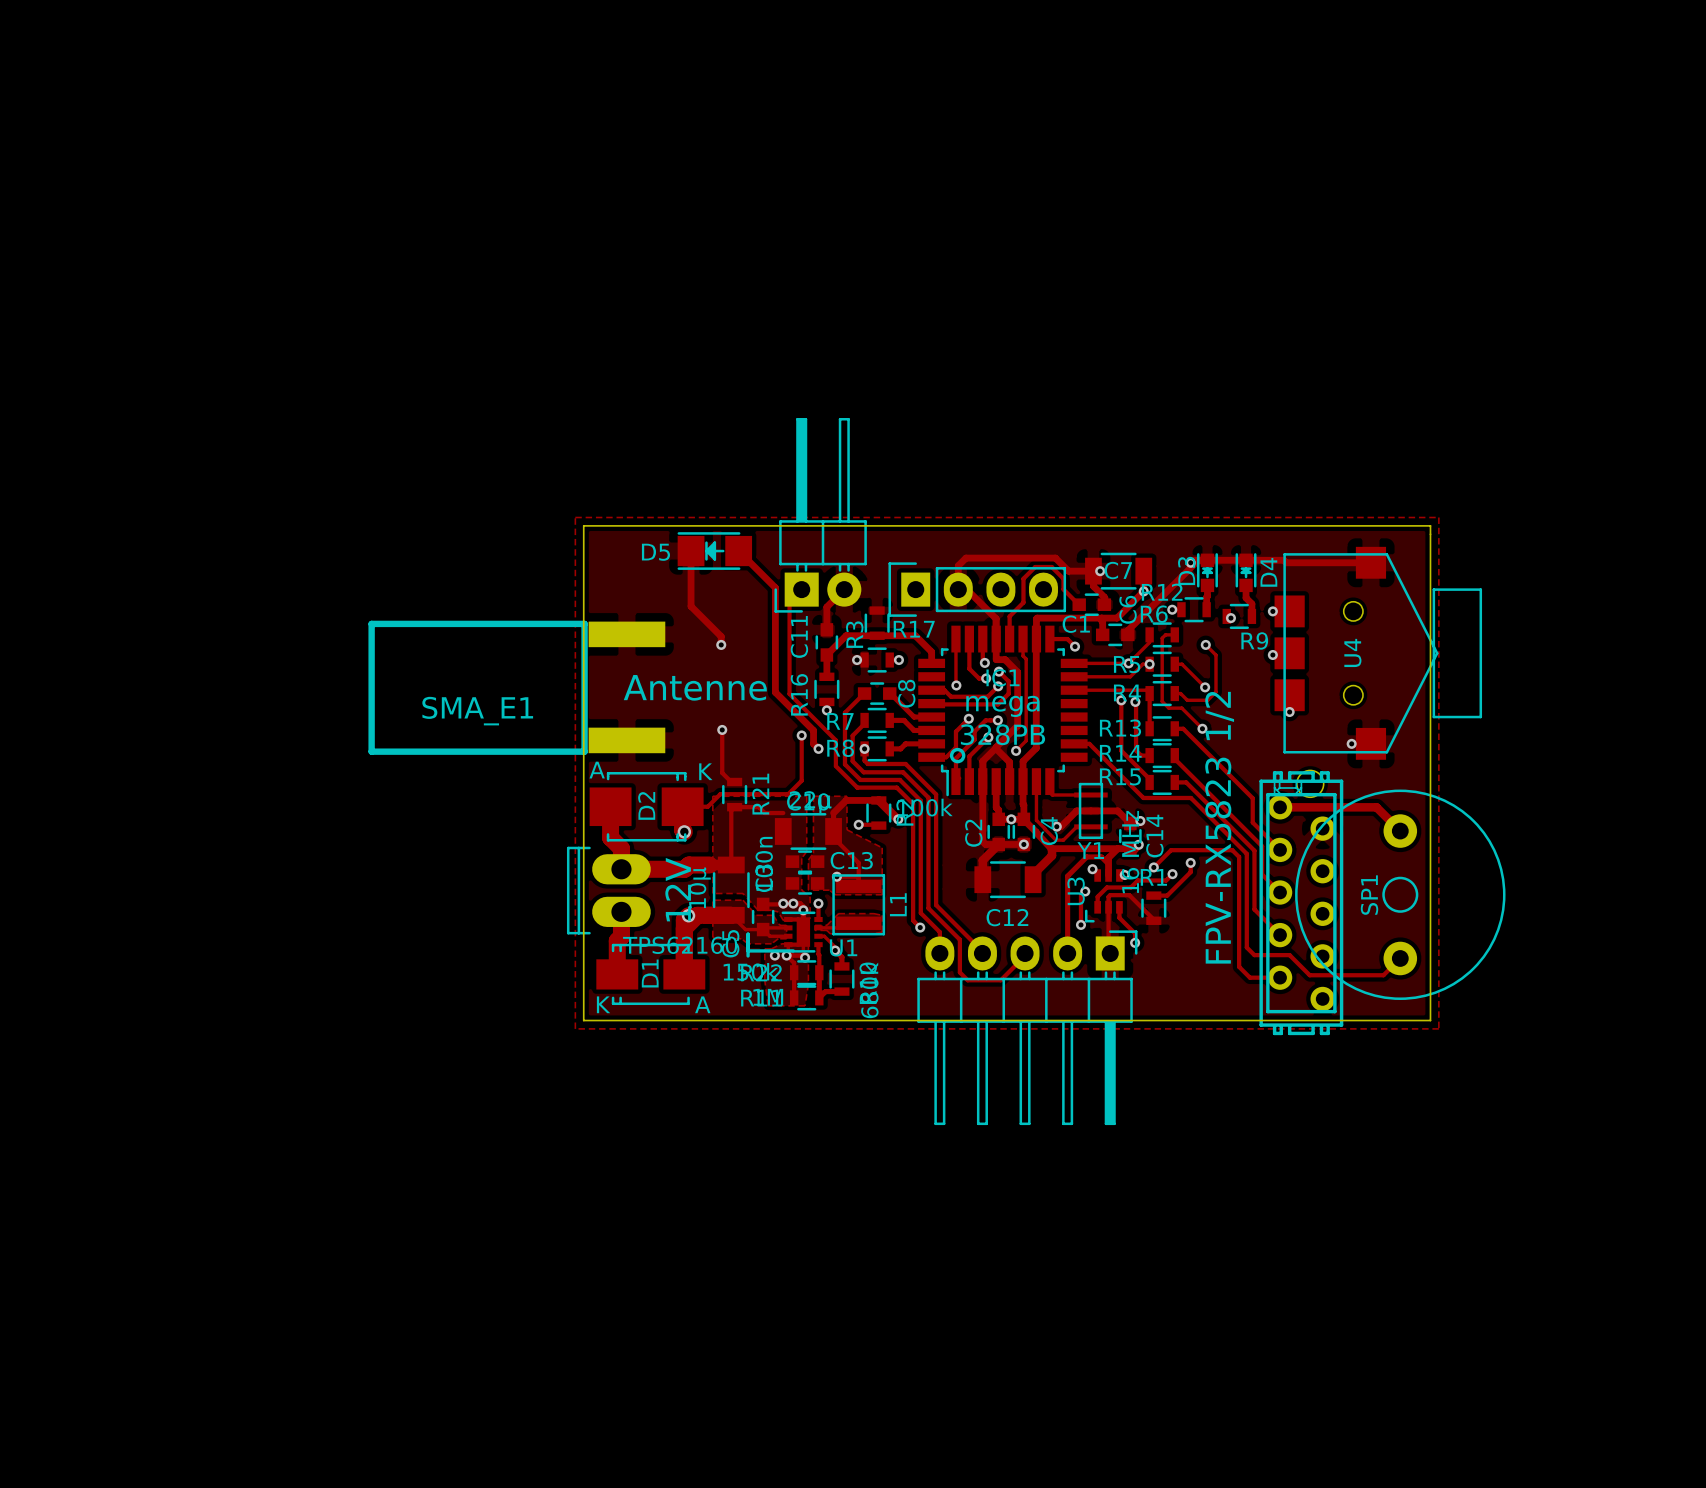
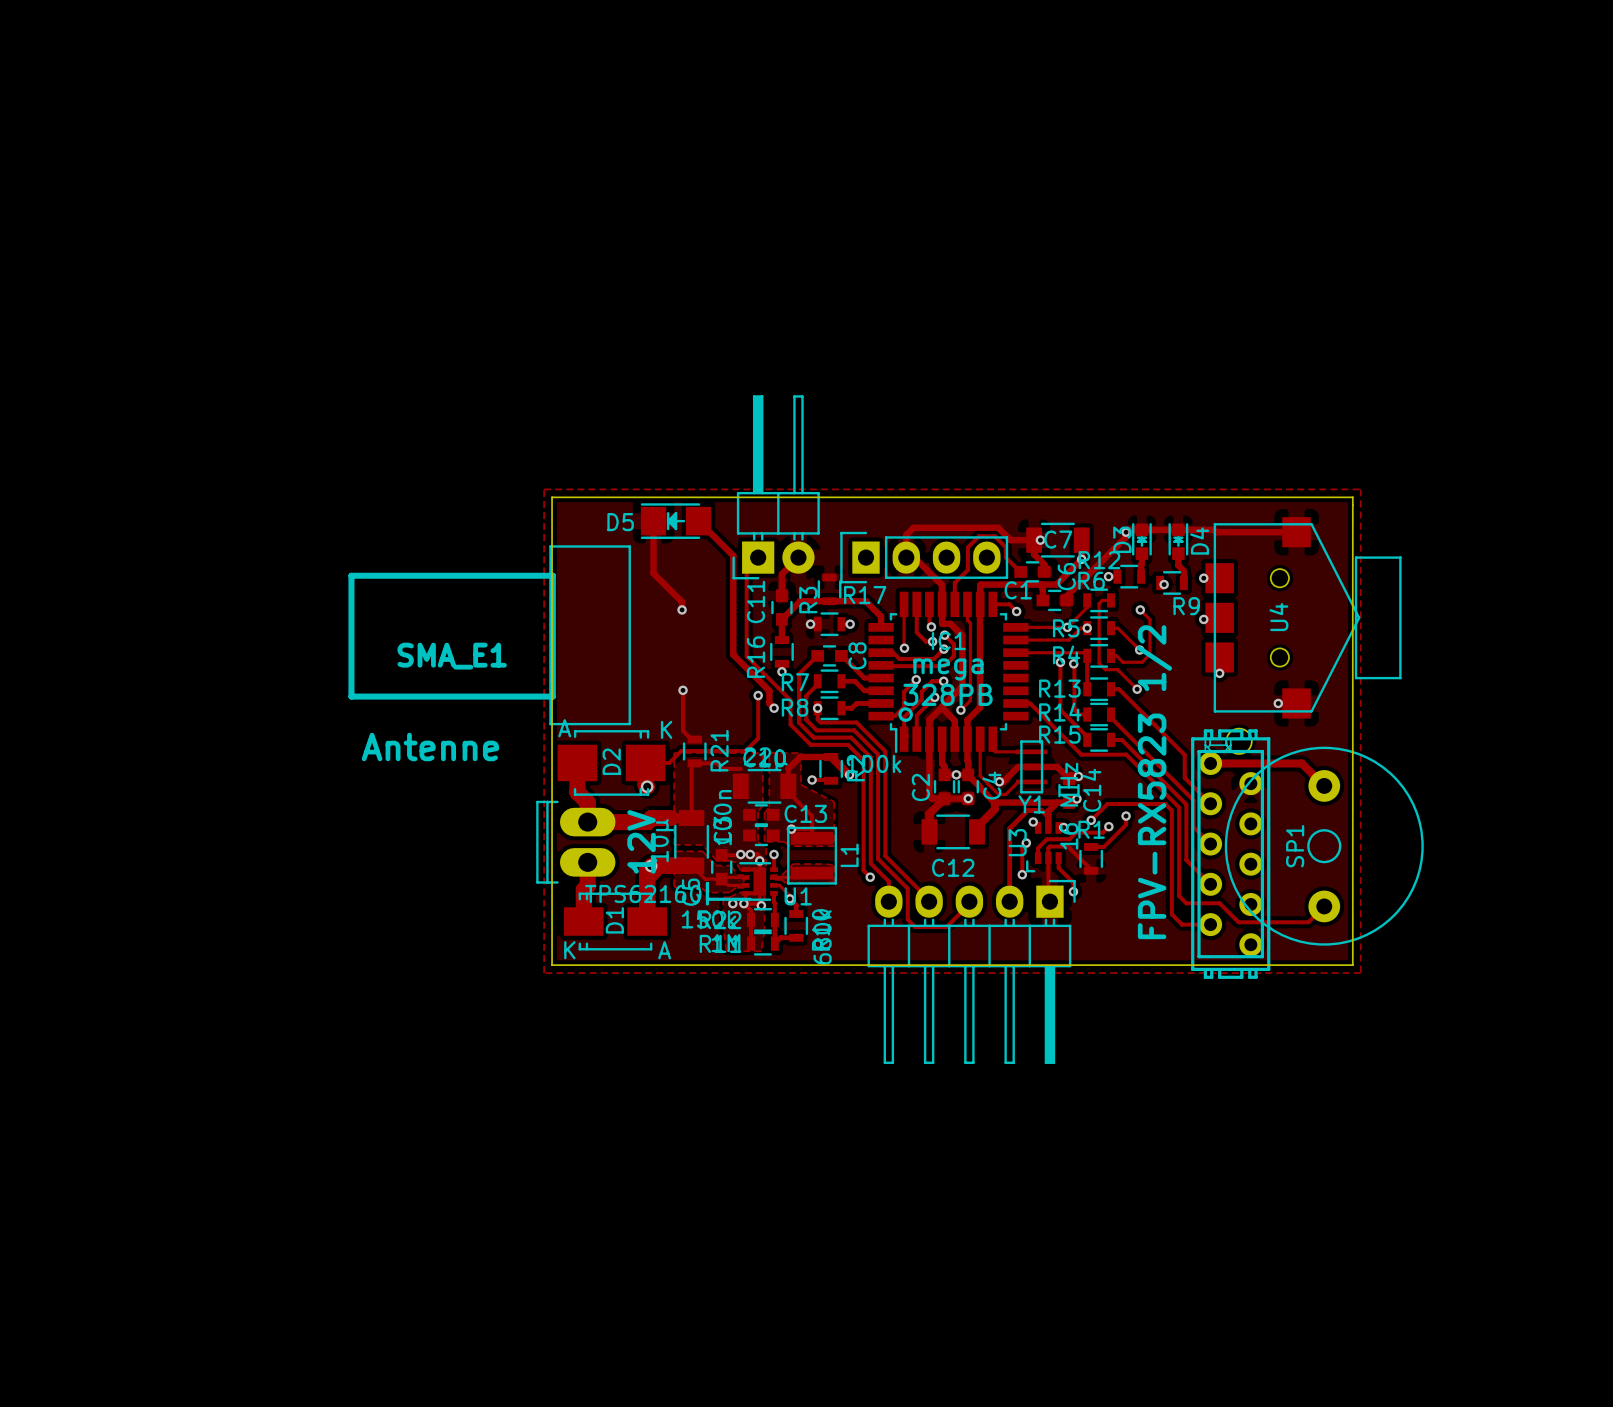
SMA_E1 footprint: [368, 620, 666, 755] -> [348, 545, 631, 726]
text position: Antenne (695, 687) -> Antenne (430, 746)

